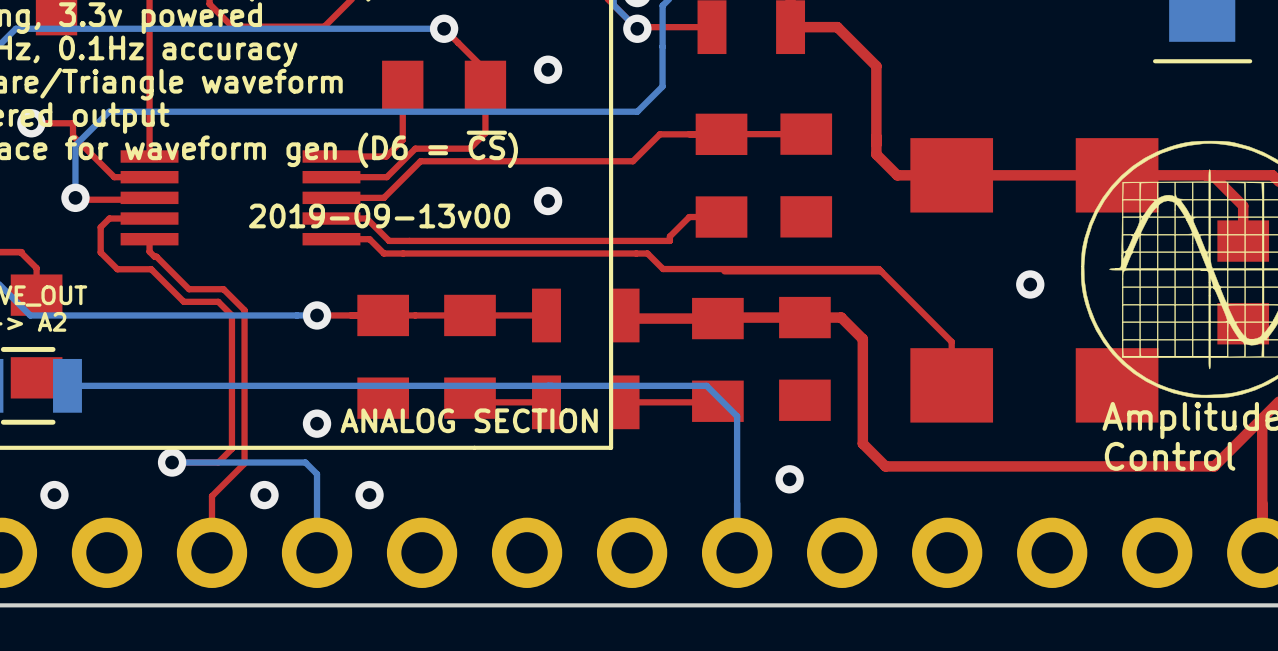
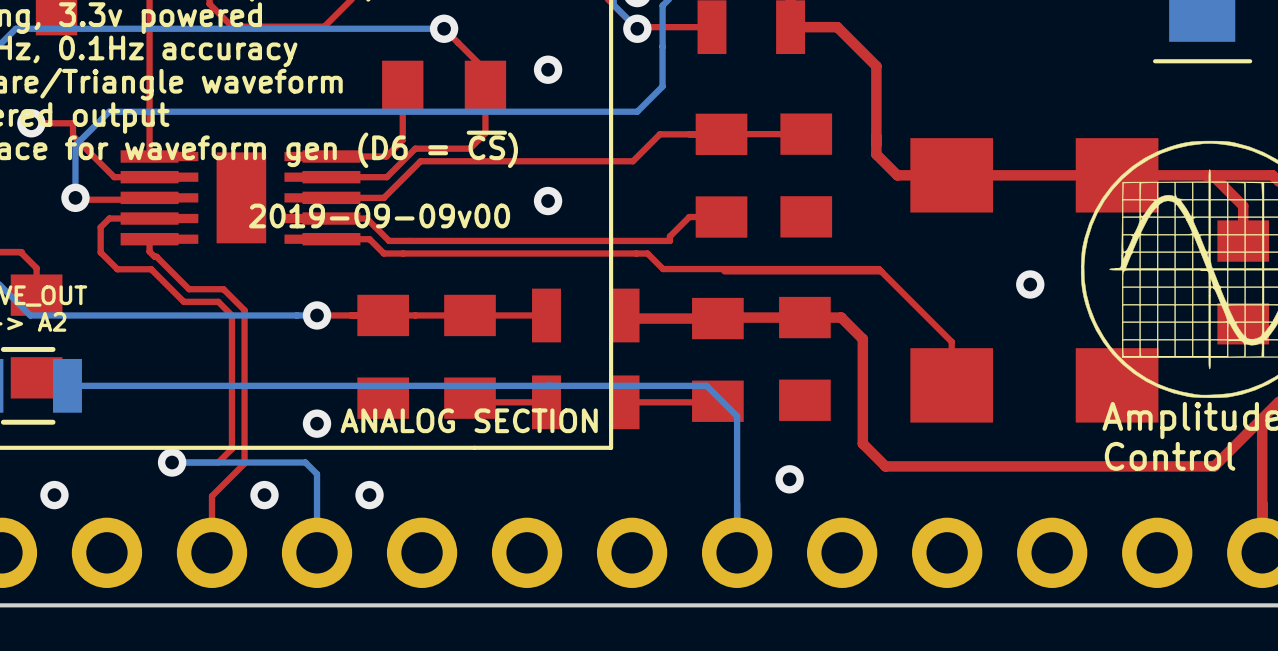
part: none -> (241, 197)
text: 2019-09-13v00 (379, 215) -> 2019-09-09v00 (379, 215)

